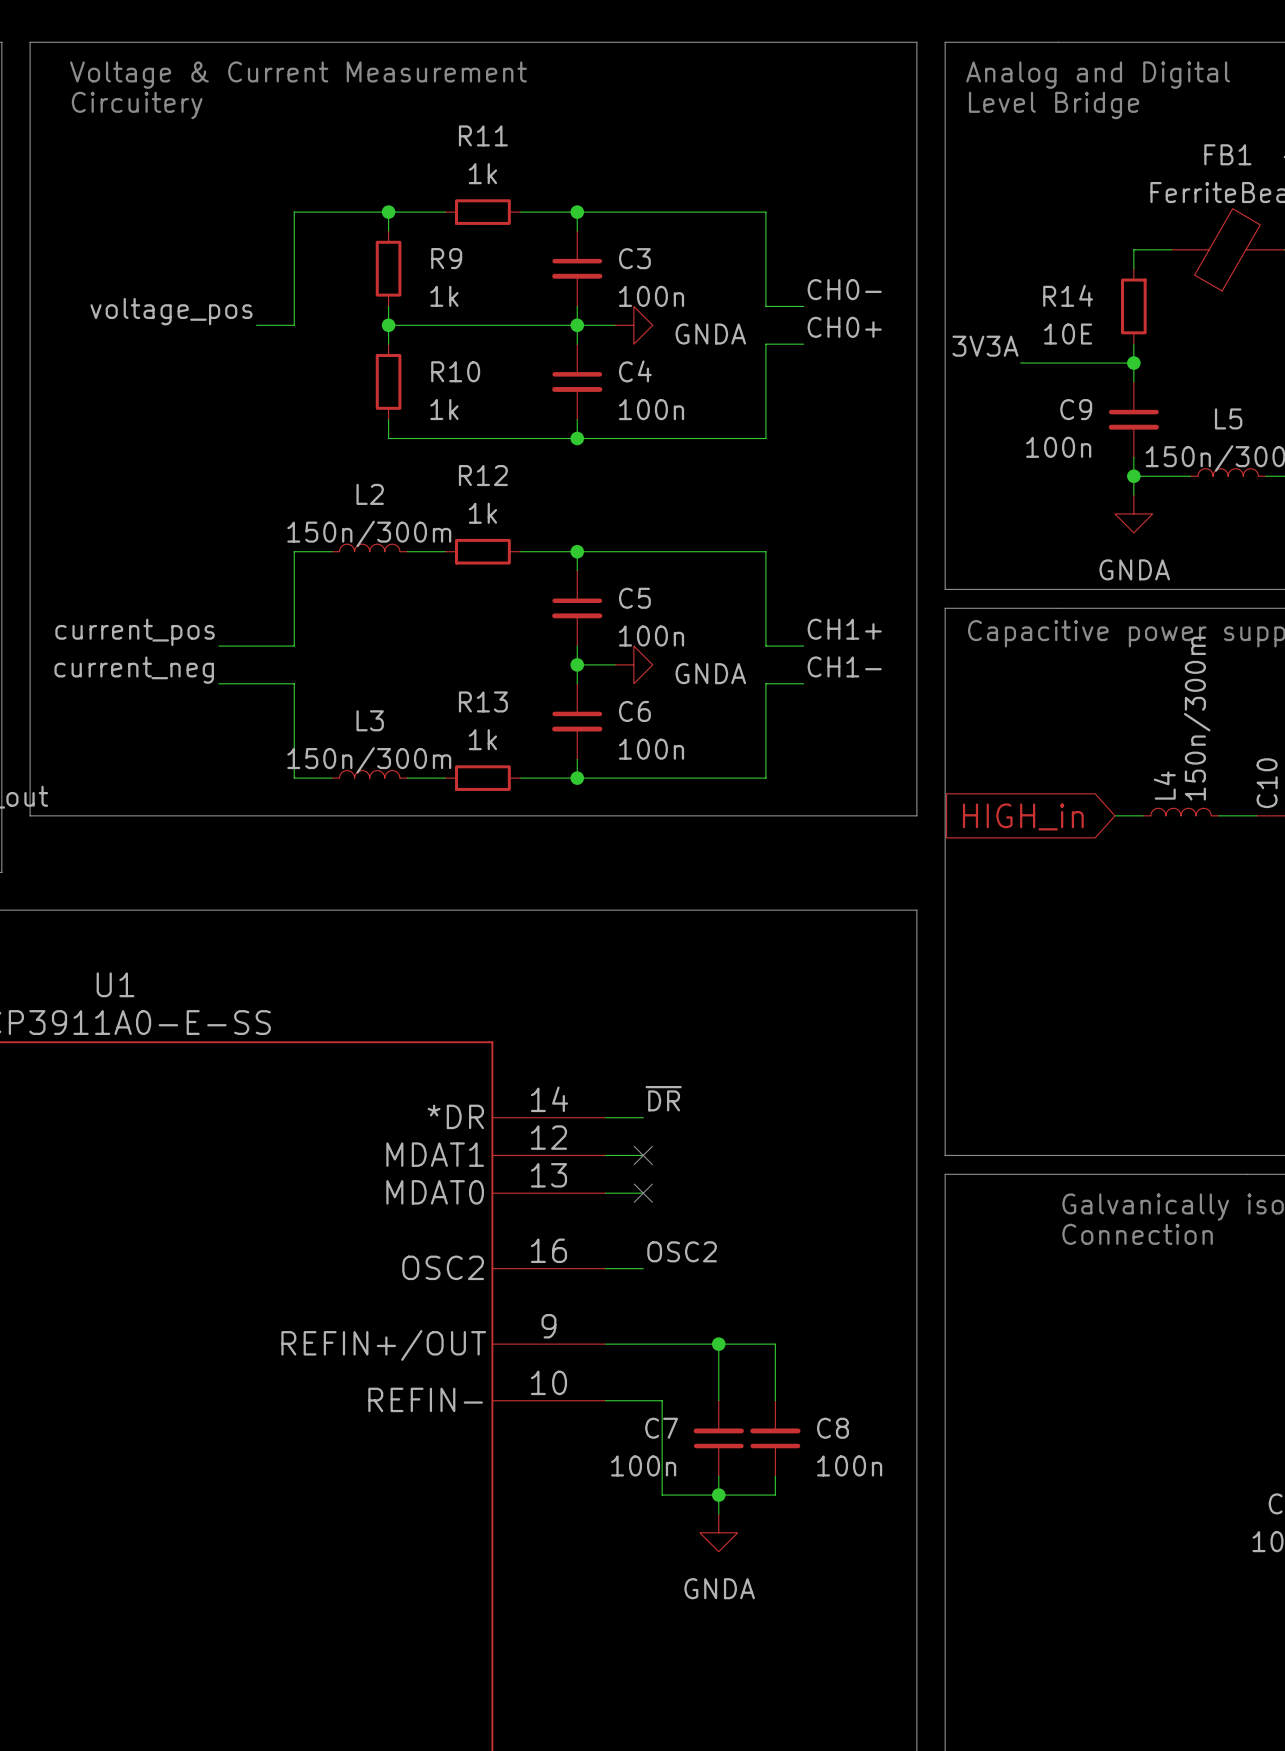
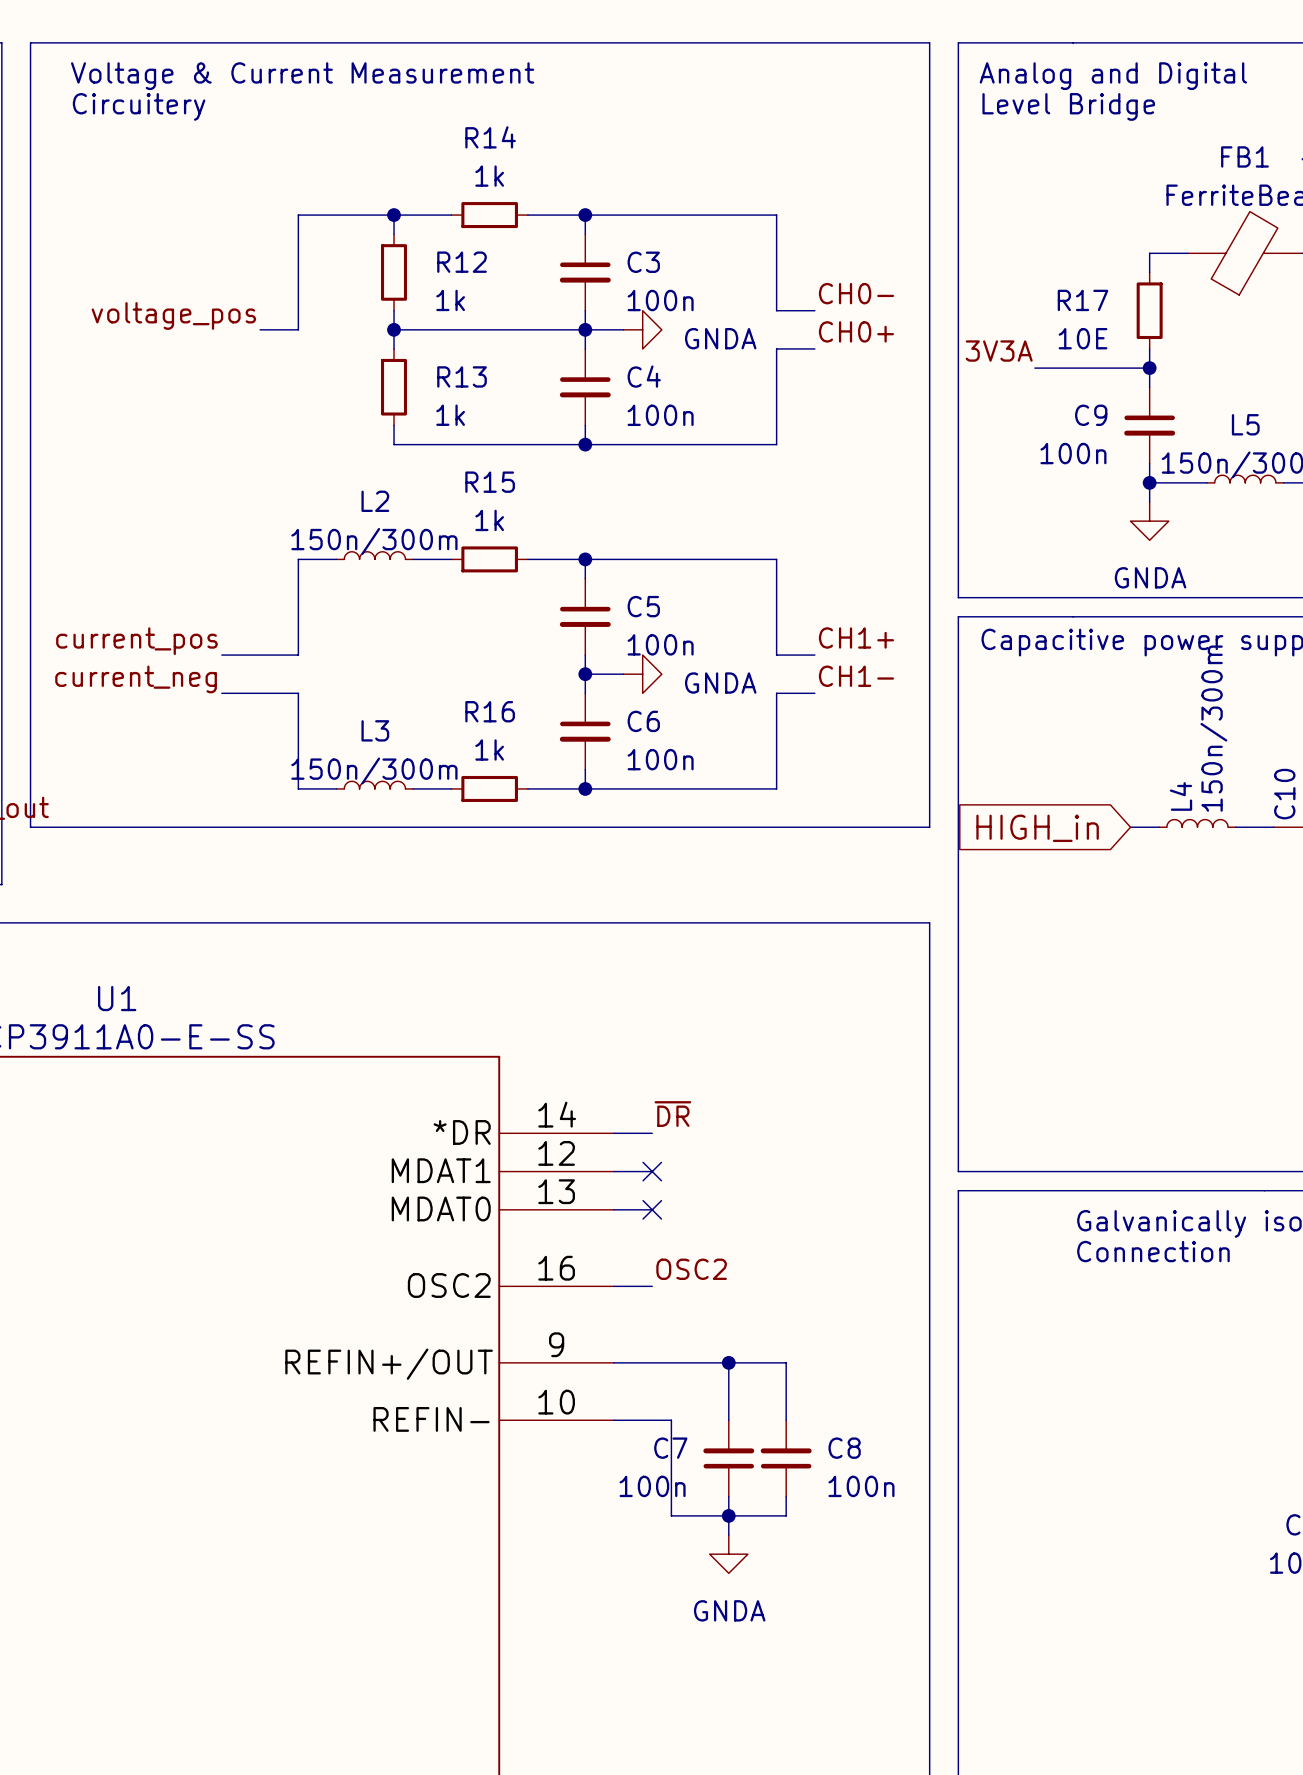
R11 name: R11 (483, 135) -> R14 (490, 137)
R9 name: R9 (446, 258) -> R12 (462, 262)
R14 name: R14 (1068, 295) -> R17 (1083, 300)
R10 name: R10 (455, 371) -> R13 (462, 376)
R12 name: R12 (483, 475) -> R15 (490, 482)
R13 name: R13 (483, 701) -> R16 (490, 711)

